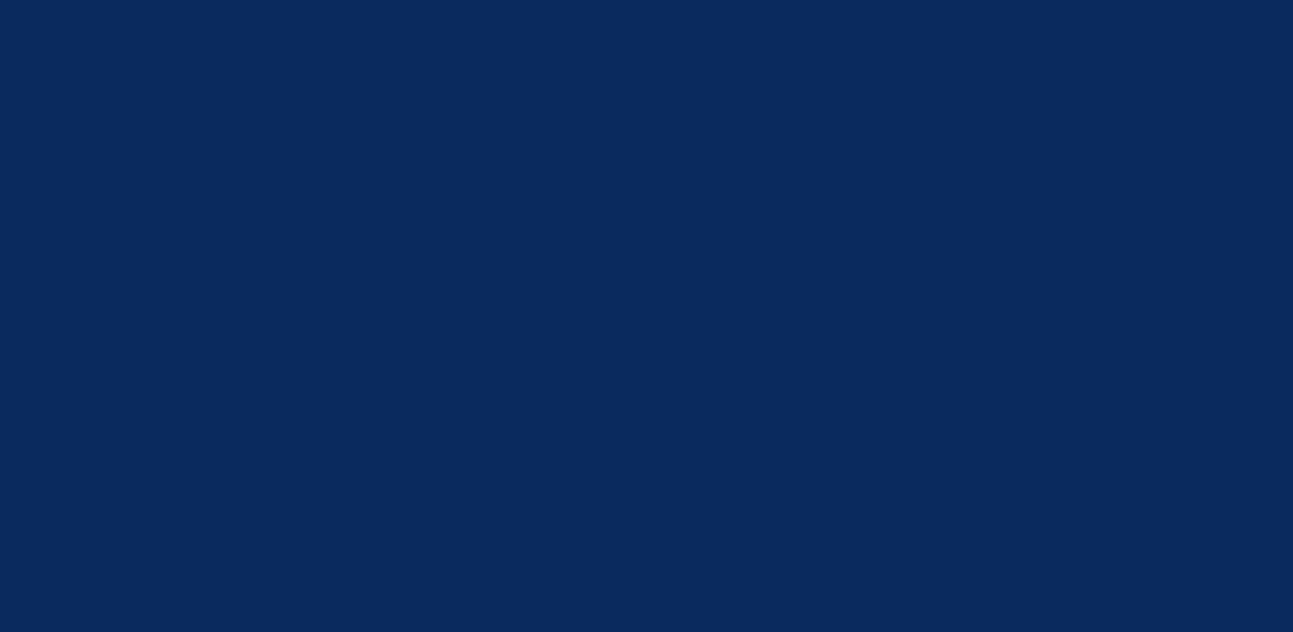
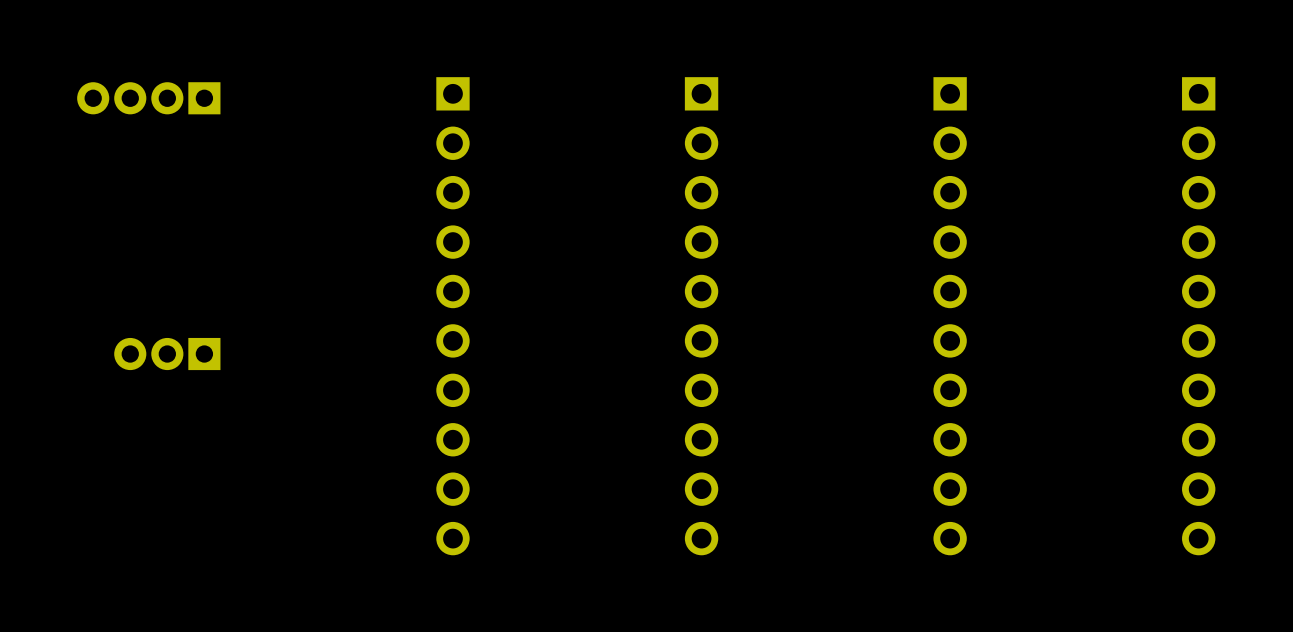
part: none -> (148, 98)
part: none -> (452, 316)
part: none -> (701, 316)
part: none -> (950, 316)
part: none -> (1198, 316)
part: none -> (167, 354)

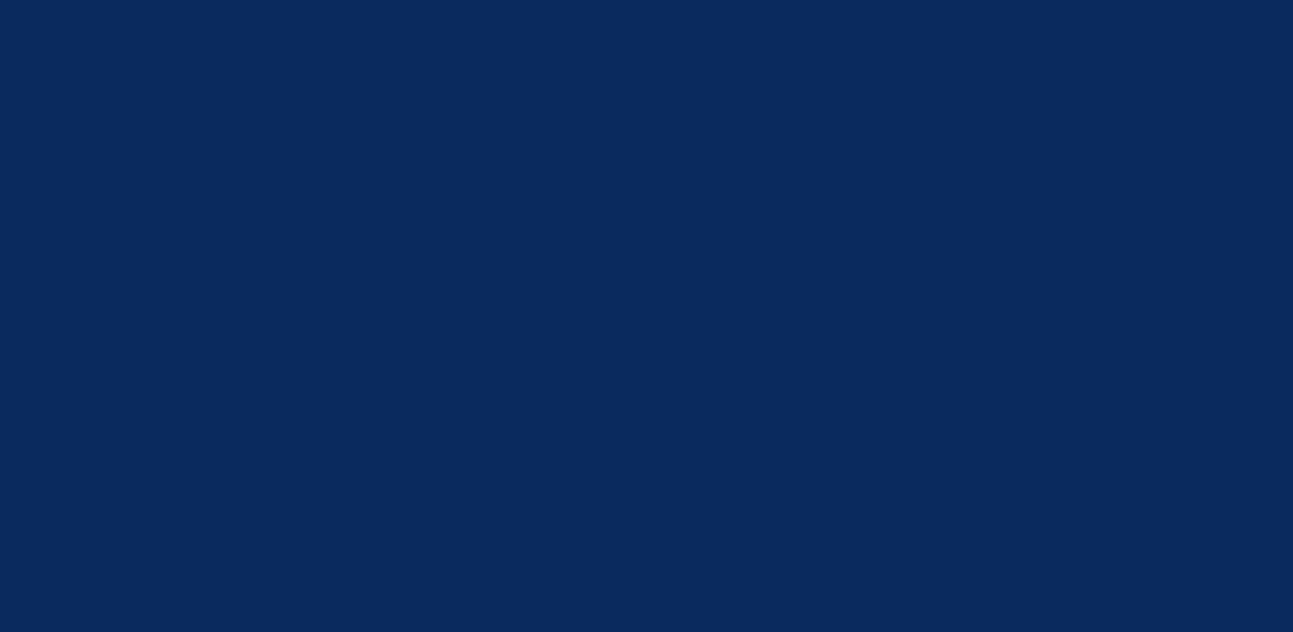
part: (148, 98) -> none
part: (452, 316) -> none
part: (701, 316) -> none
part: (950, 316) -> none
part: (1198, 316) -> none
part: (167, 354) -> none

